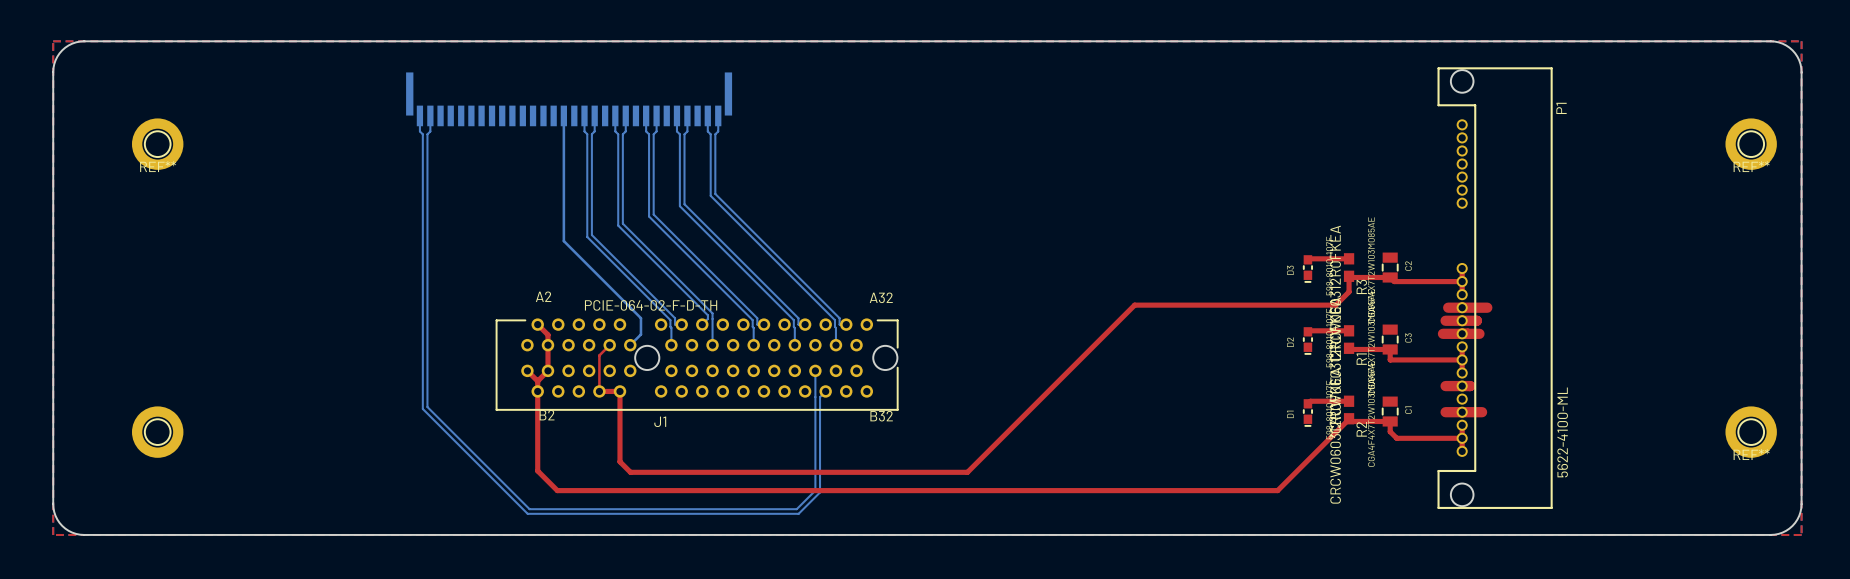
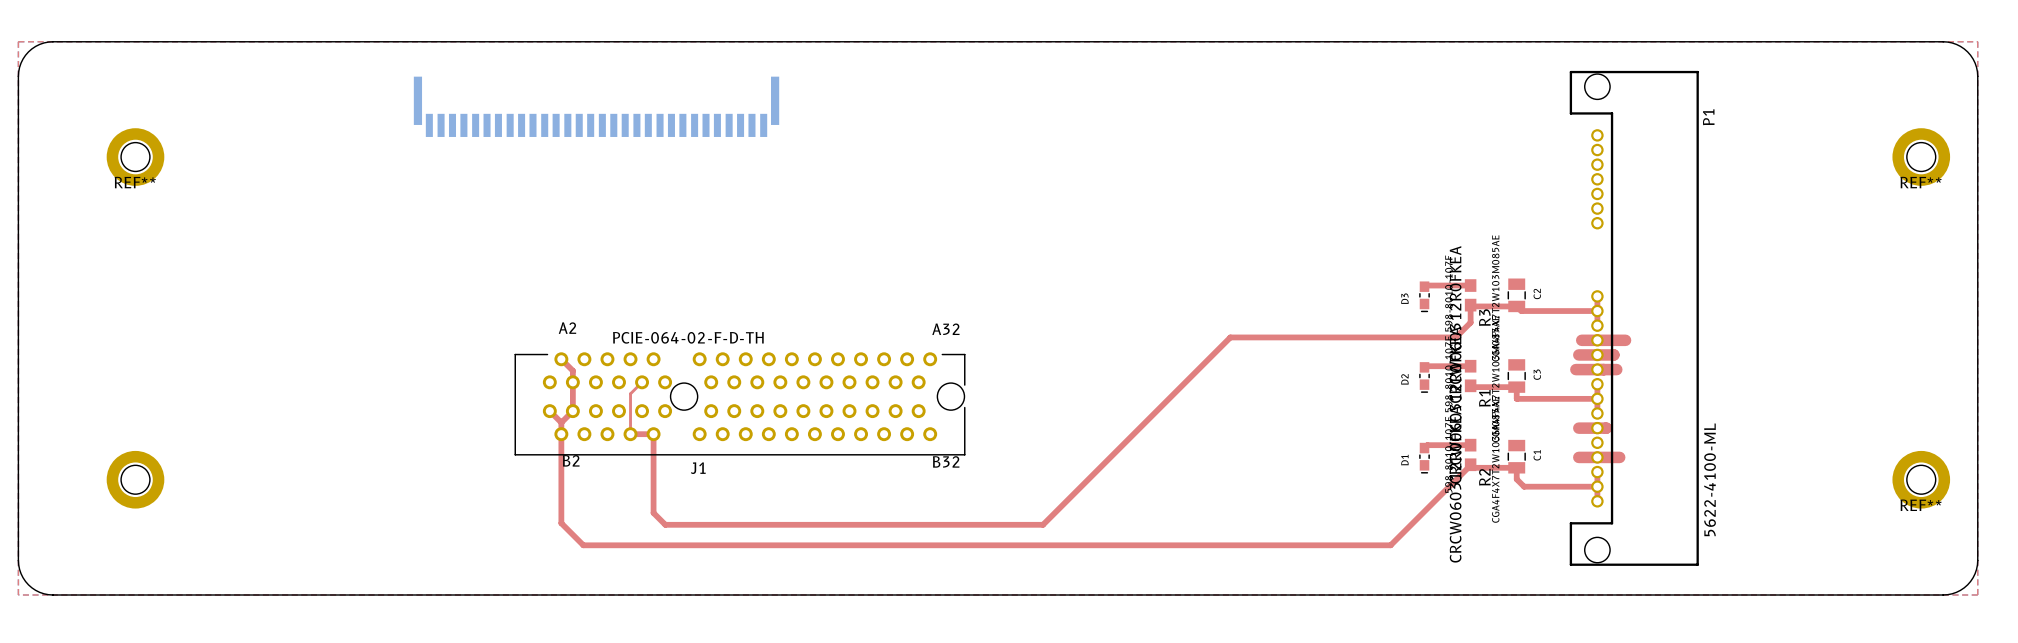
bottom track: (419, 115) (419, 131) (422, 134) (422, 408) (527, 513) (798, 513) (820, 492) (820, 397) (825, 391) -> none
bottom track: (430, 115) (430, 131) (427, 134) (427, 407) (529, 509) (796, 509) (815, 490) (815, 370) -> none
bottom track: (563, 115) (563, 241) (640, 318) (640, 334) (630, 345) -> none
bottom track: (584, 115) (584, 131) (587, 134) (587, 236) (670, 320) (671, 345) -> none
bottom track: (594, 115) (594, 131) (591, 134) (591, 235) (675, 318) (675, 324) (681, 324) -> none
bottom track: (615, 115) (615, 131) (618, 134) (618, 225) (707, 315) (707, 318) (702, 324) -> none
bottom track: (625, 115) (625, 131) (622, 134) (622, 223) (712, 313) (712, 345) -> none
bottom track: (646, 115) (646, 131) (649, 134) (649, 216) (752, 320) (753, 345) -> none
bottom track: (656, 115) (656, 131) (653, 134) (653, 214) (757, 318) (757, 324) (763, 324) -> none
bottom track: (676, 115) (676, 131) (679, 134) (679, 206) (793, 320) (794, 345) -> none
bottom track: (687, 115) (687, 131) (684, 134) (684, 204) (798, 318) (798, 324) (805, 324) -> none
bottom track: (707, 115) (707, 131) (710, 134) (710, 195) (834, 320) (835, 345) -> none
bottom track: (718, 115) (718, 131) (715, 134) (715, 193) (839, 318) (839, 324) (846, 324) -> none

